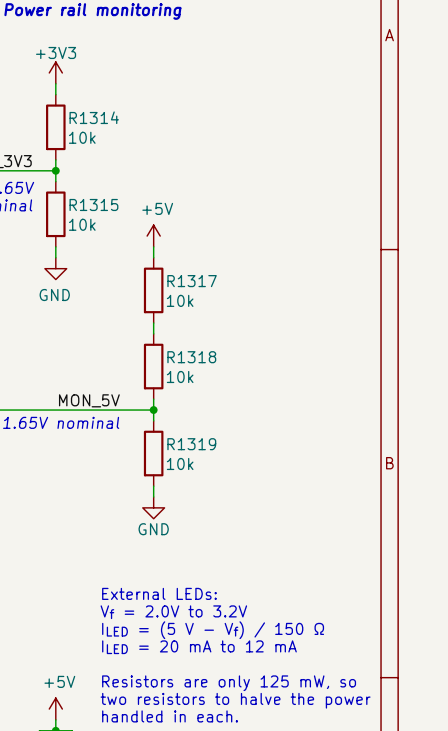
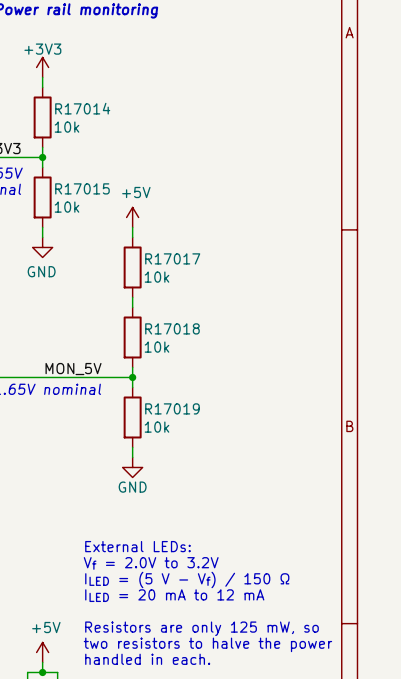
R1314 name: R1314 (94, 117) -> R17014 (82, 108)
R1315 name: R1315 (93, 204) -> R17015 (82, 188)
R1317 name: R1317 (192, 281) -> R17017 (172, 258)
R1318 name: R1318 (191, 357) -> R17018 (172, 328)
R1319 name: R1319 (191, 444) -> R17019 (172, 408)

